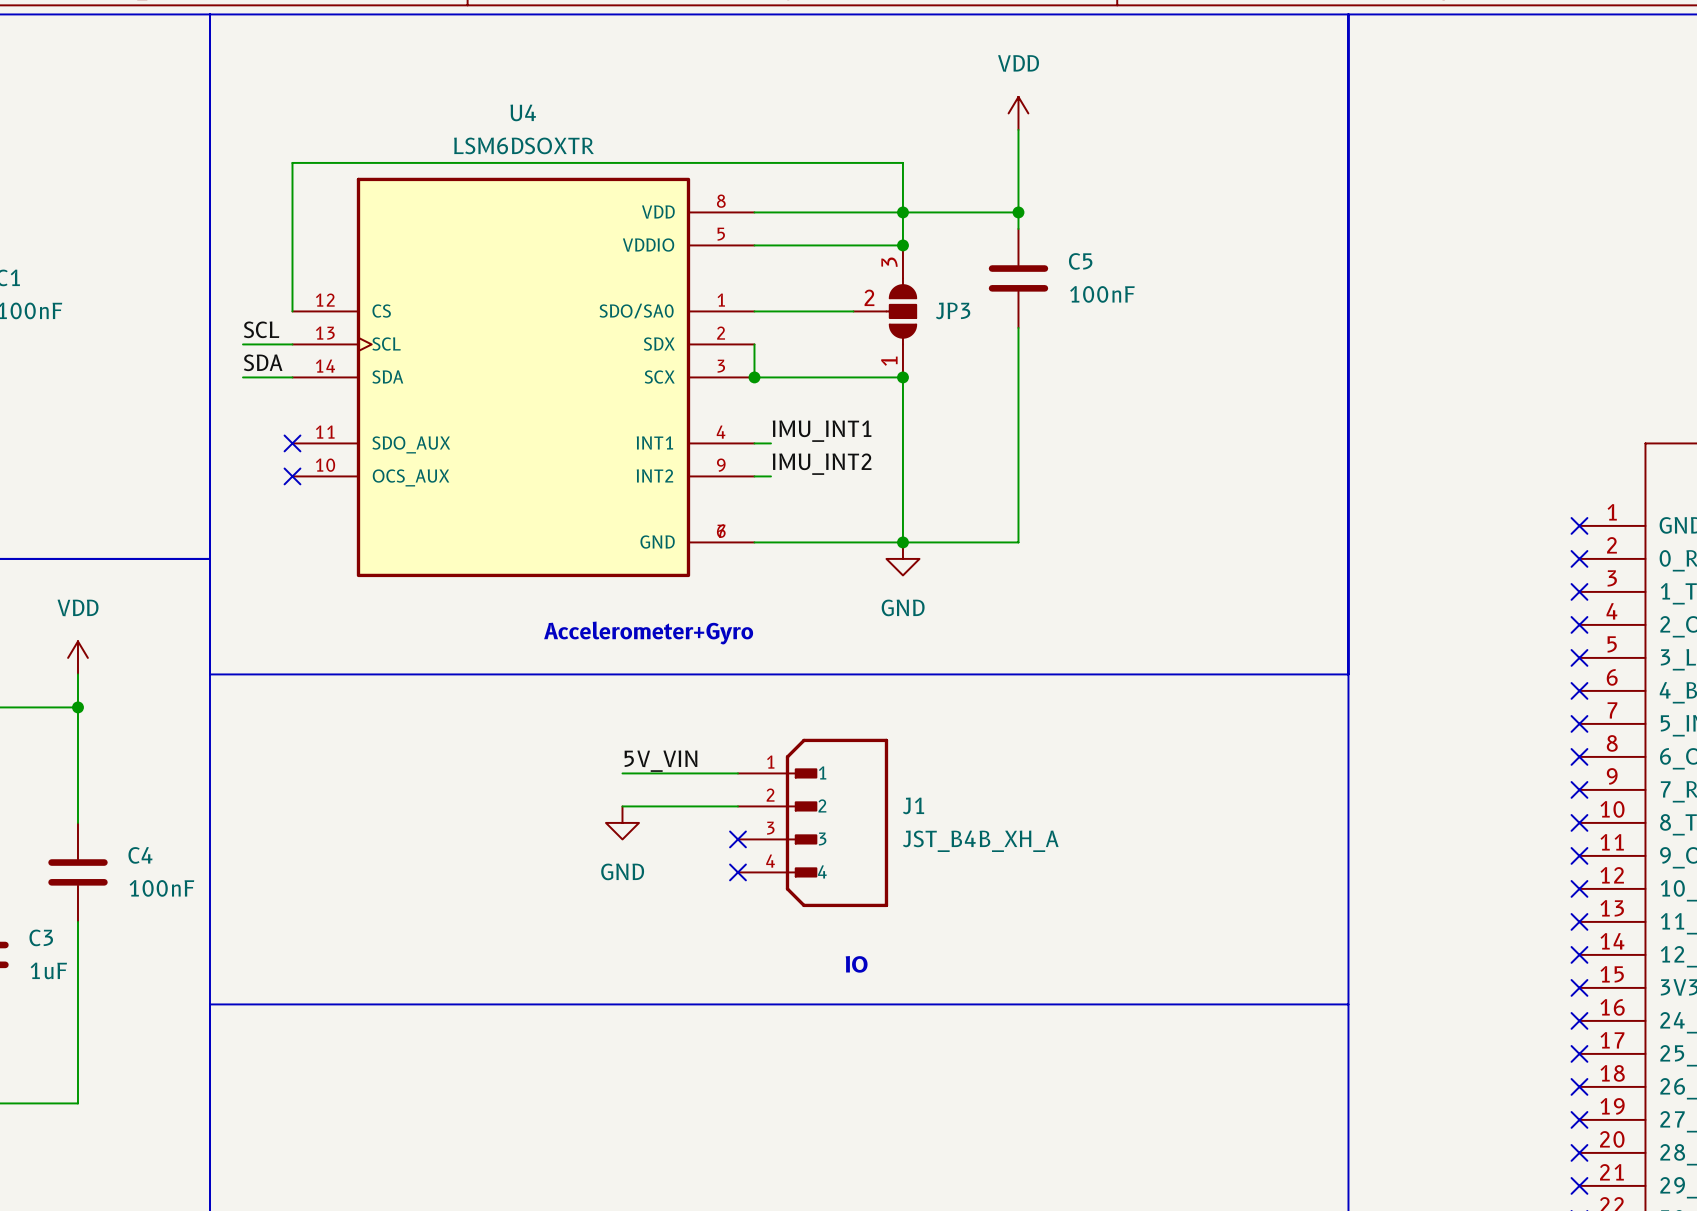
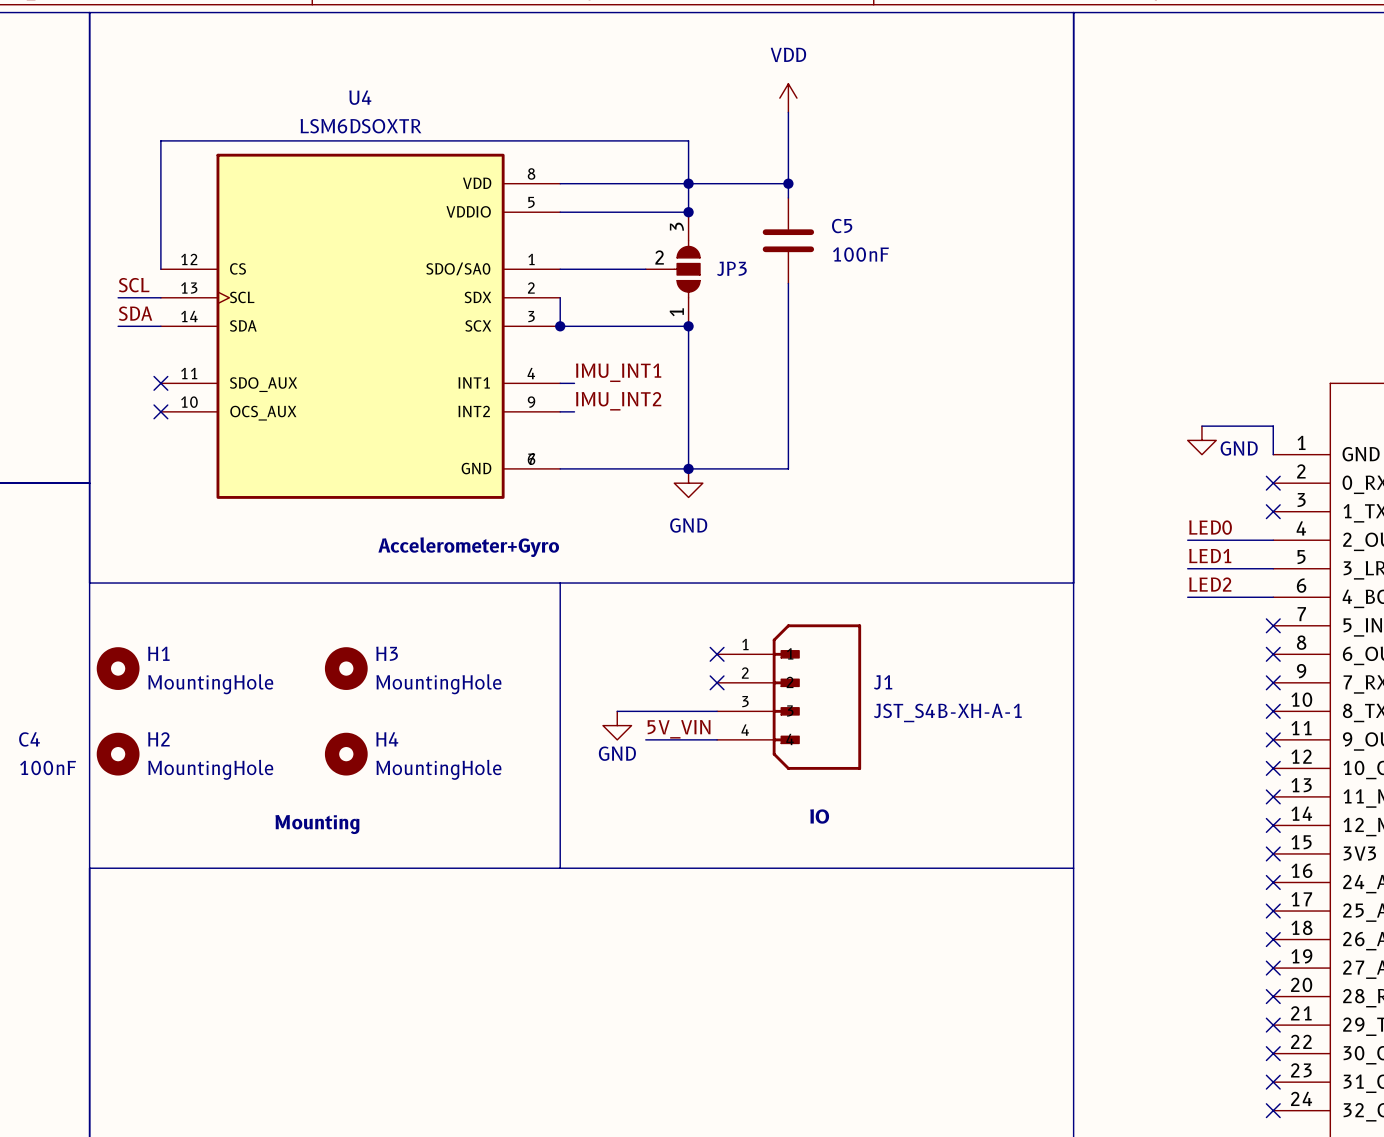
wire: none -> (1201, 426) (1273, 426) (1273, 454)
power symbol: none -> GND (1201, 440)
no-connect mark: (1579, 525) -> none
label: none -> LED0 (1210, 527)
wire: none -> (1187, 540) (1273, 540)
no-connect mark: (1579, 624) -> none
label: none -> LED1 (1210, 556)
wire: none -> (1187, 568) (1273, 568)
no-connect mark: (1579, 657) -> none
line: none -> (560, 583) (560, 868)
label: none -> LED2 (1210, 584)
wire: none -> (1187, 597) (1273, 597)
no-connect mark: (1579, 690) -> none
J1 symbol: [737, 738, 889, 908] -> [717, 624, 862, 770]
no-connect mark: none -> (717, 654)
label position: 5V_VIN (660, 761) -> 5V_VIN (679, 729)
H1: none -> MountingHole (118, 668)
H3: none -> MountingHole (346, 668)
wire: (622, 773) (737, 773) -> none
no-connect mark: none -> (717, 682)
wire: (622, 806) (737, 806) -> (617, 711) (717, 711)
power symbol position: GND (622, 822) -> GND (617, 725)
no-connect mark: (737, 839) -> none
J1 value: JST_B4B_XH_A (980, 841) -> JST_S4B-XH-A-1 (947, 712)
wire: none -> (645, 739) (717, 739)
power symbol text position: GND (622, 871) -> GND (617, 753)
H2: none -> MountingHole (118, 754)
H4: none -> MountingHole (346, 754)
no-connect mark: (737, 872) -> none
text: none -> Mounting (317, 824)
text position: IO (856, 964) -> IO (819, 816)

